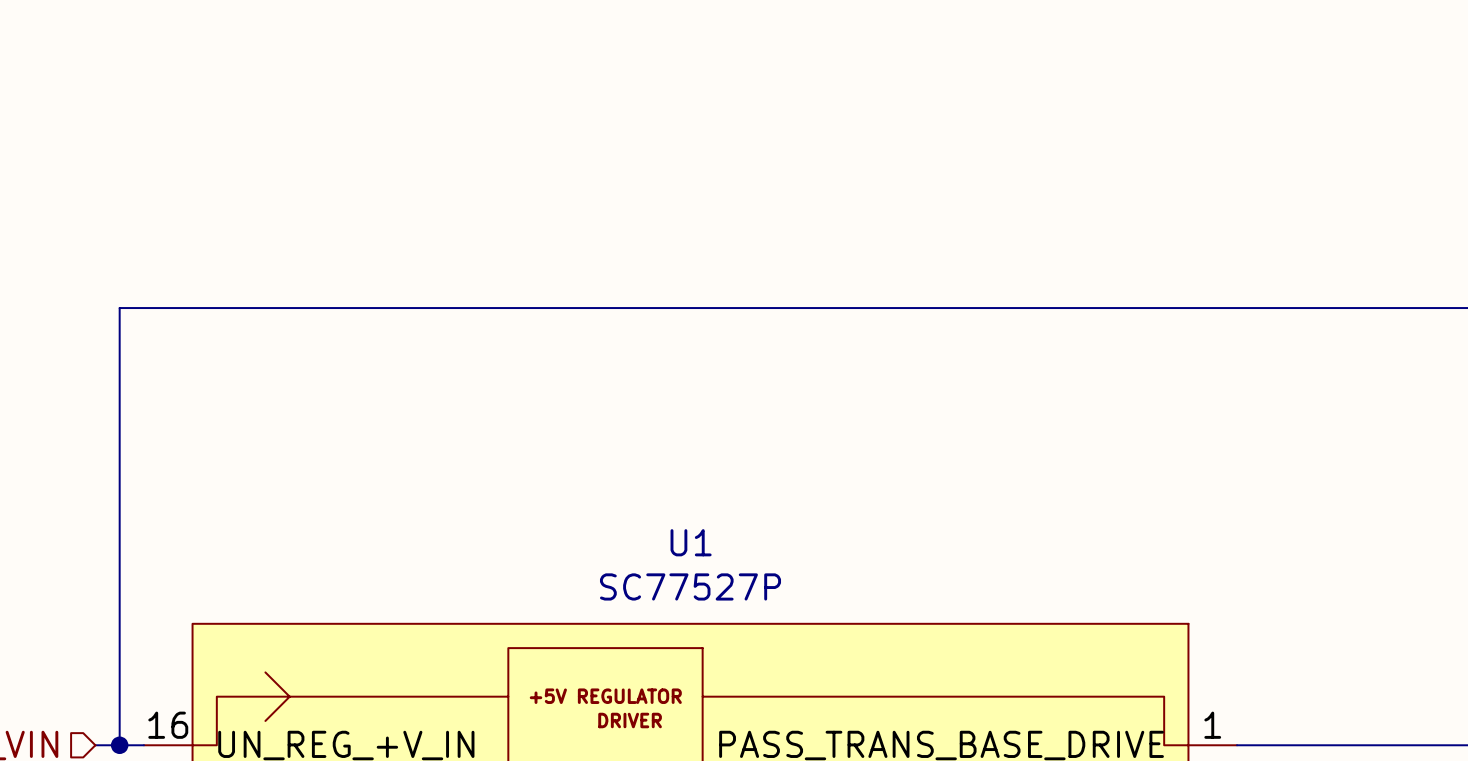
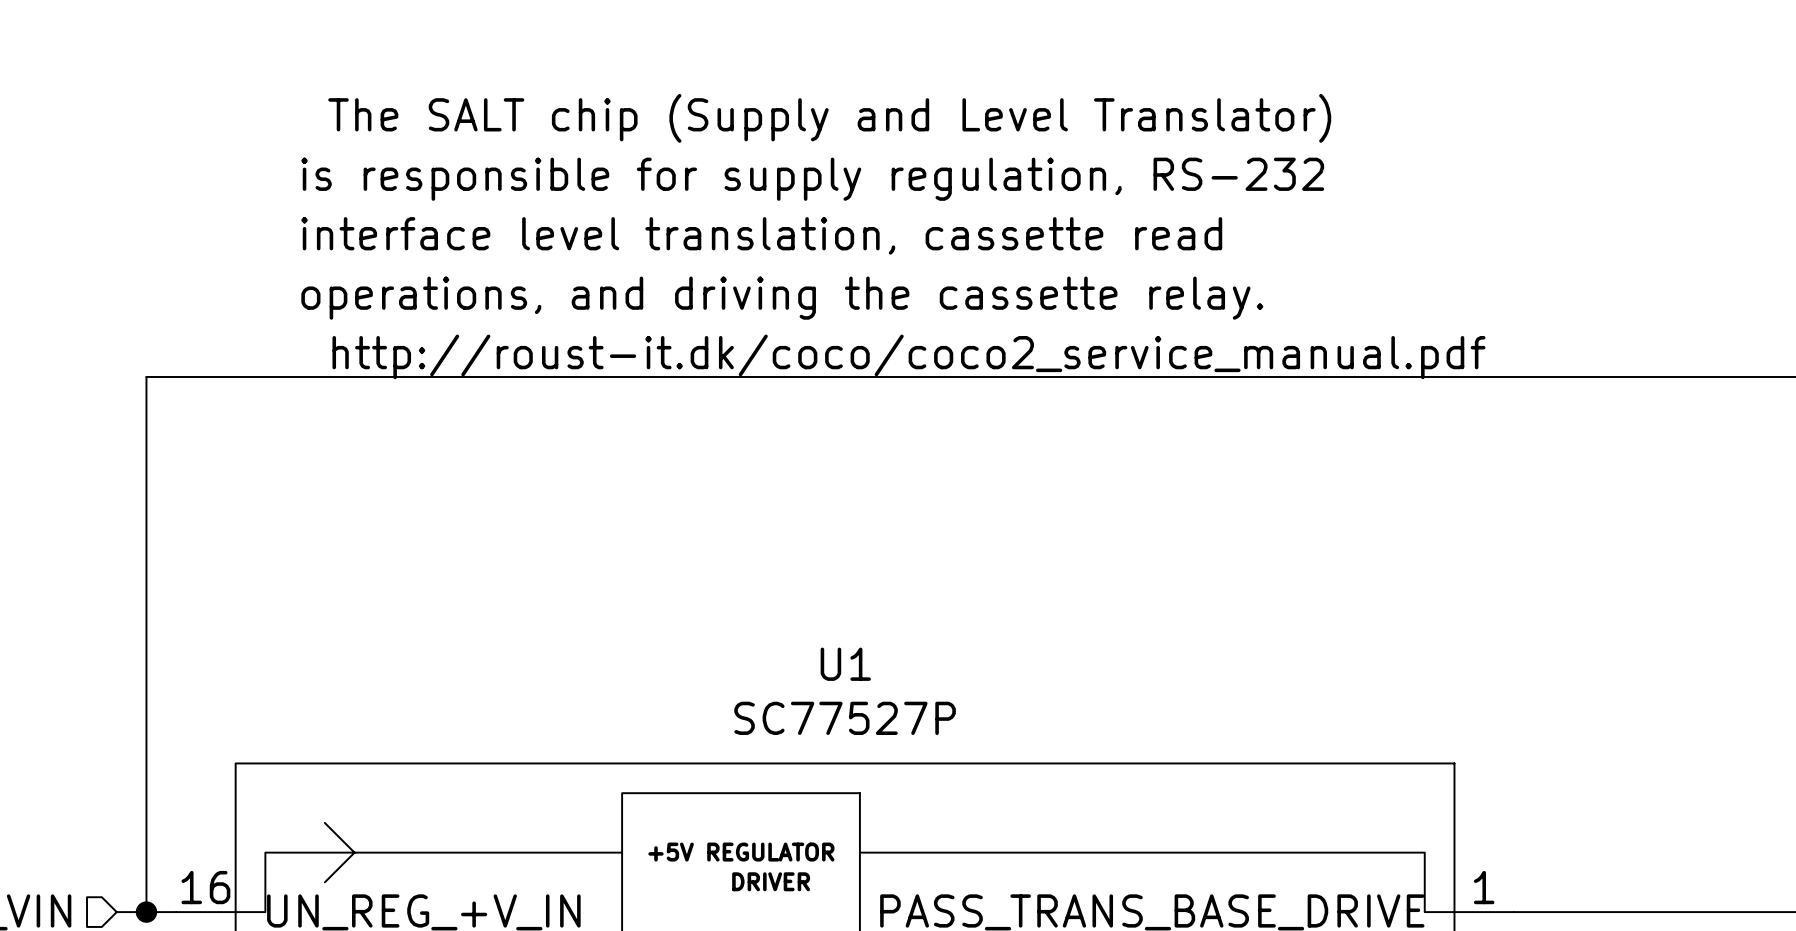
text: none -> The SALT chip (Supply and Level Translator) (829, 118)
text: none -> is responsible for supply regulation, RS-232 (812, 179)
text: none -> interface level translation, cassette read (761, 235)
text: none -> operations, and driving the cassette relay. (782, 298)
text: none -> http://roust-it.dk/coco/coco2_service_manual.pdf (908, 356)

